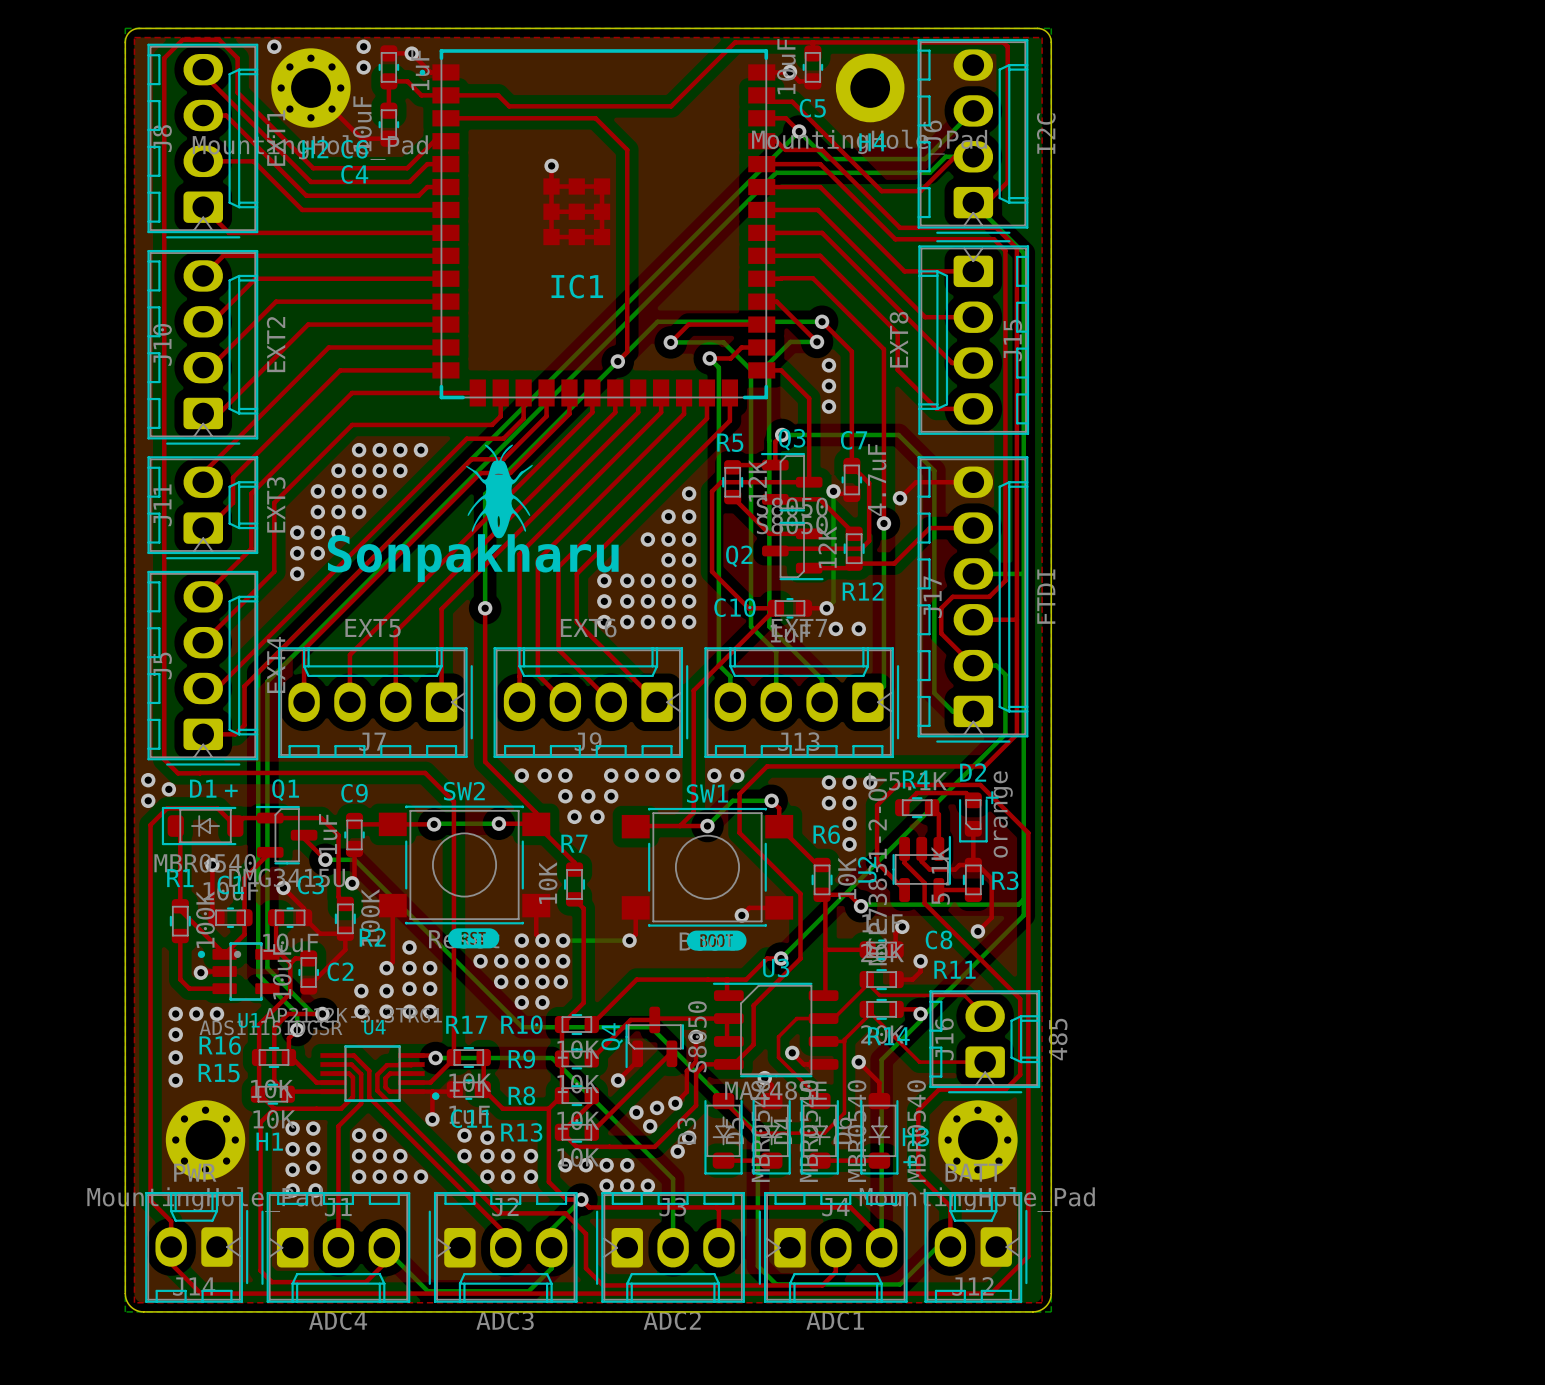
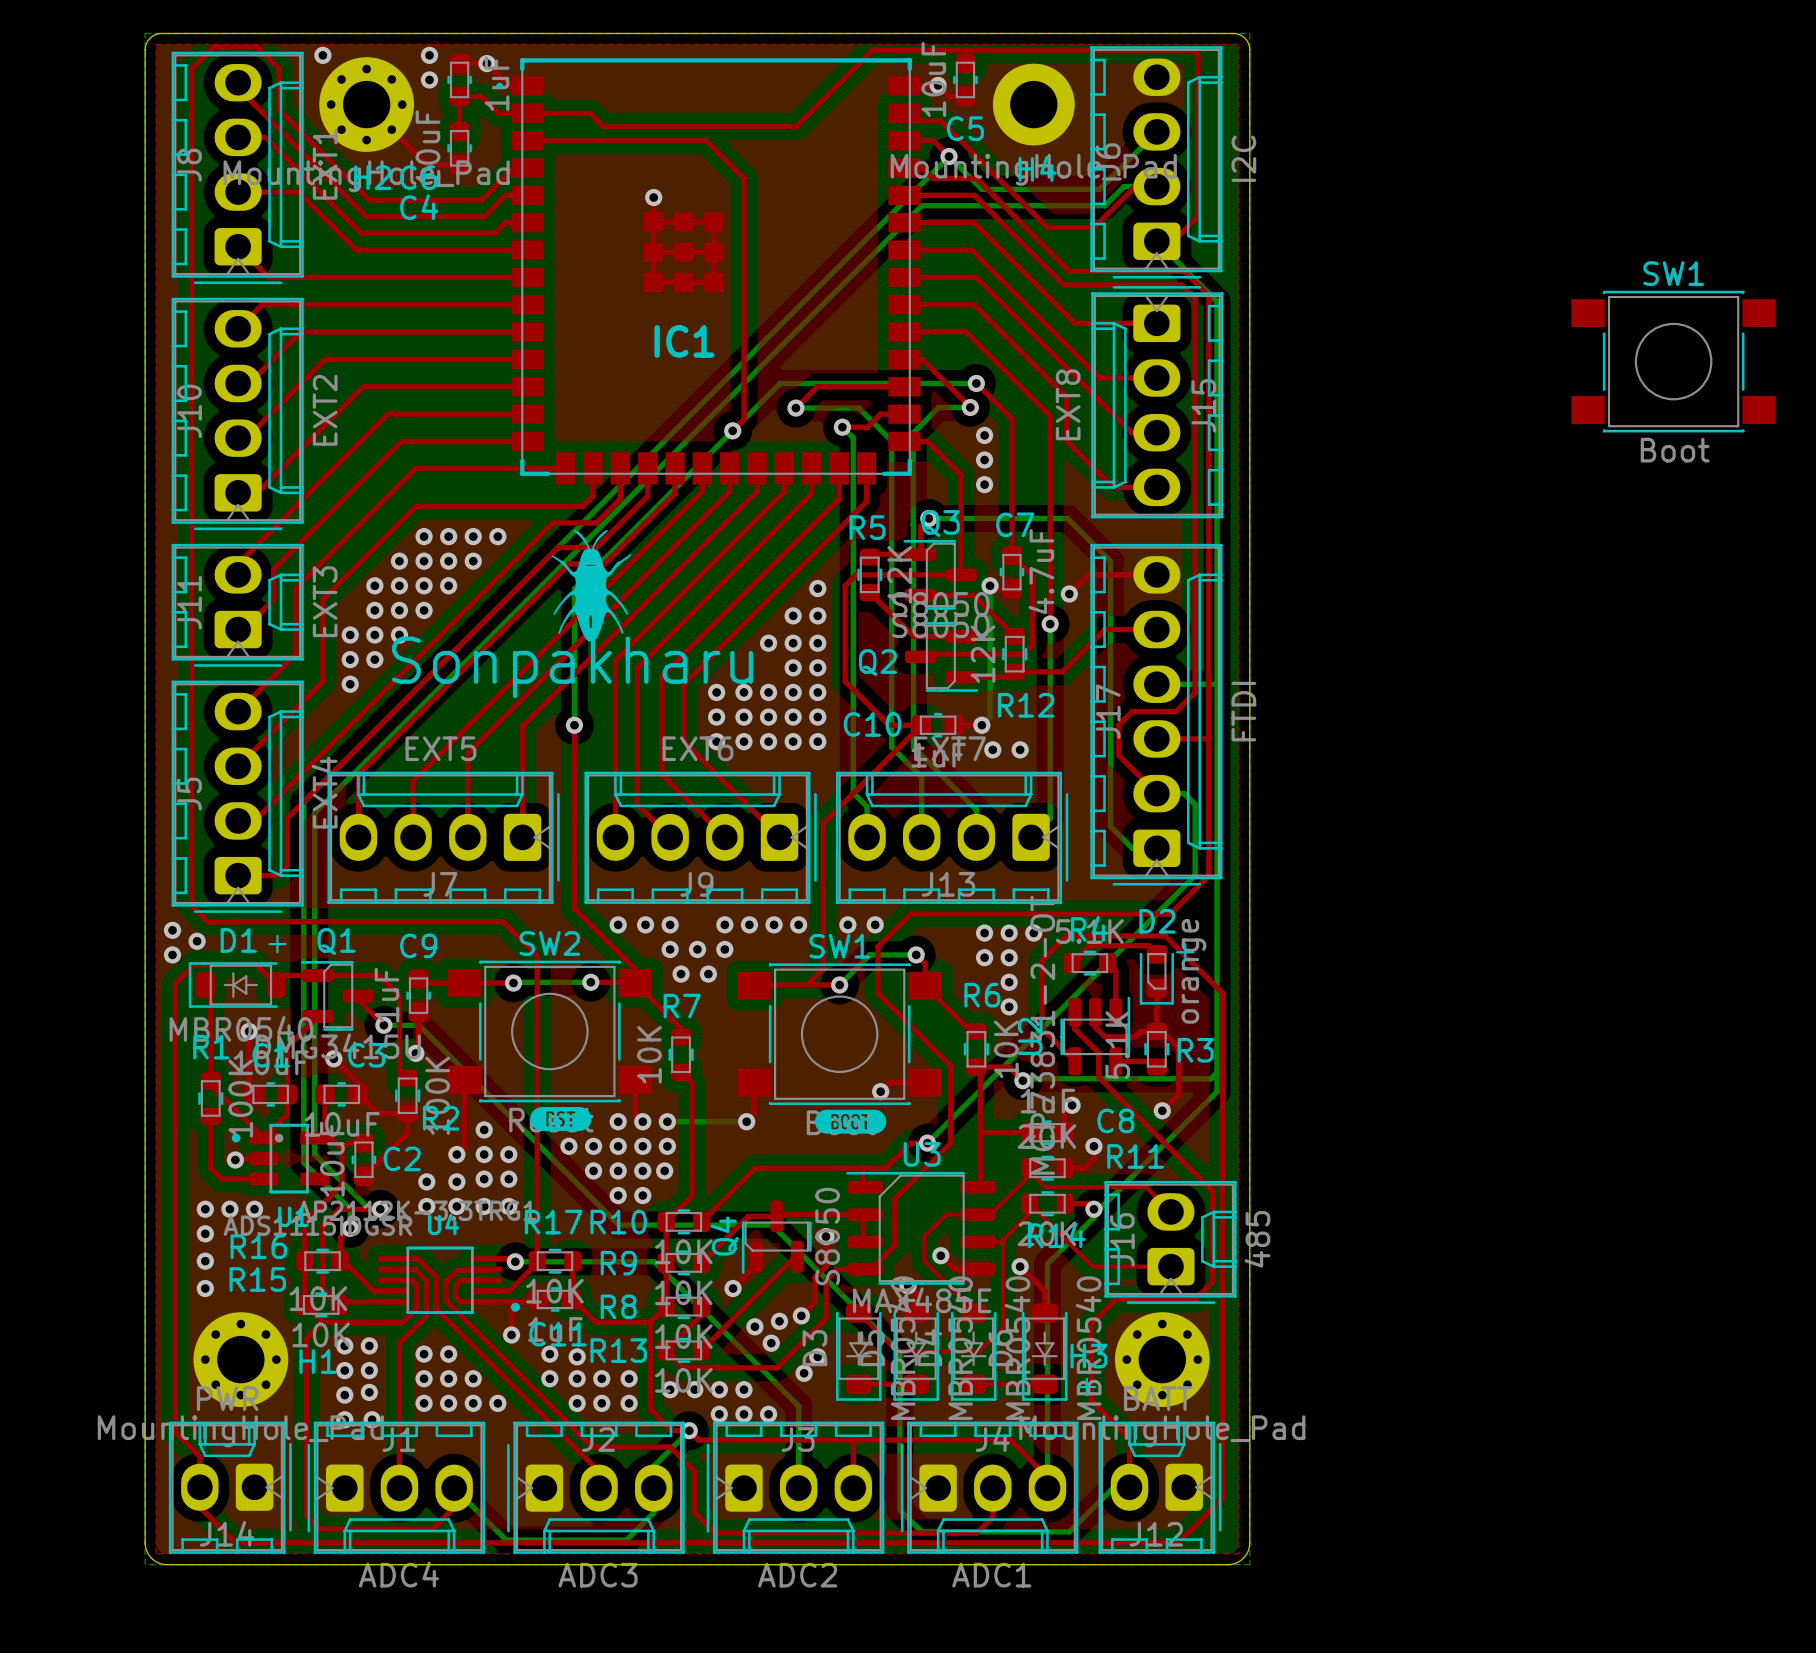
SW1: none -> Boot (1673, 361)

